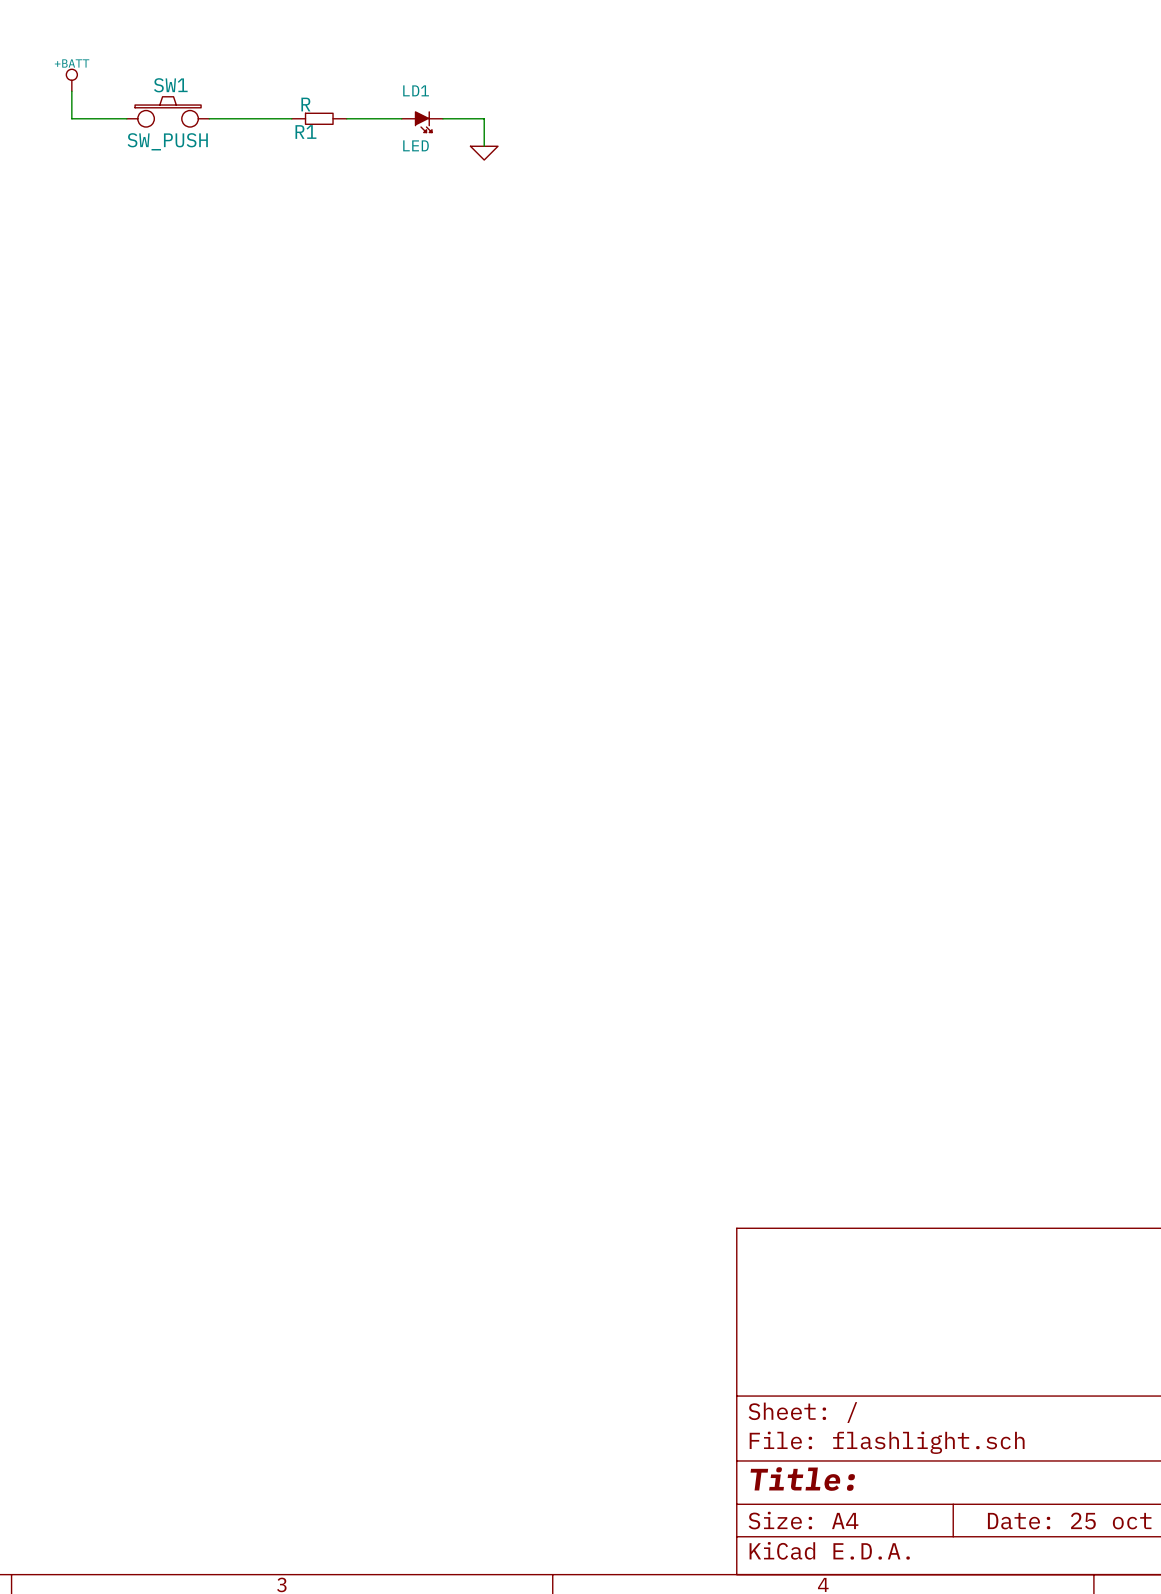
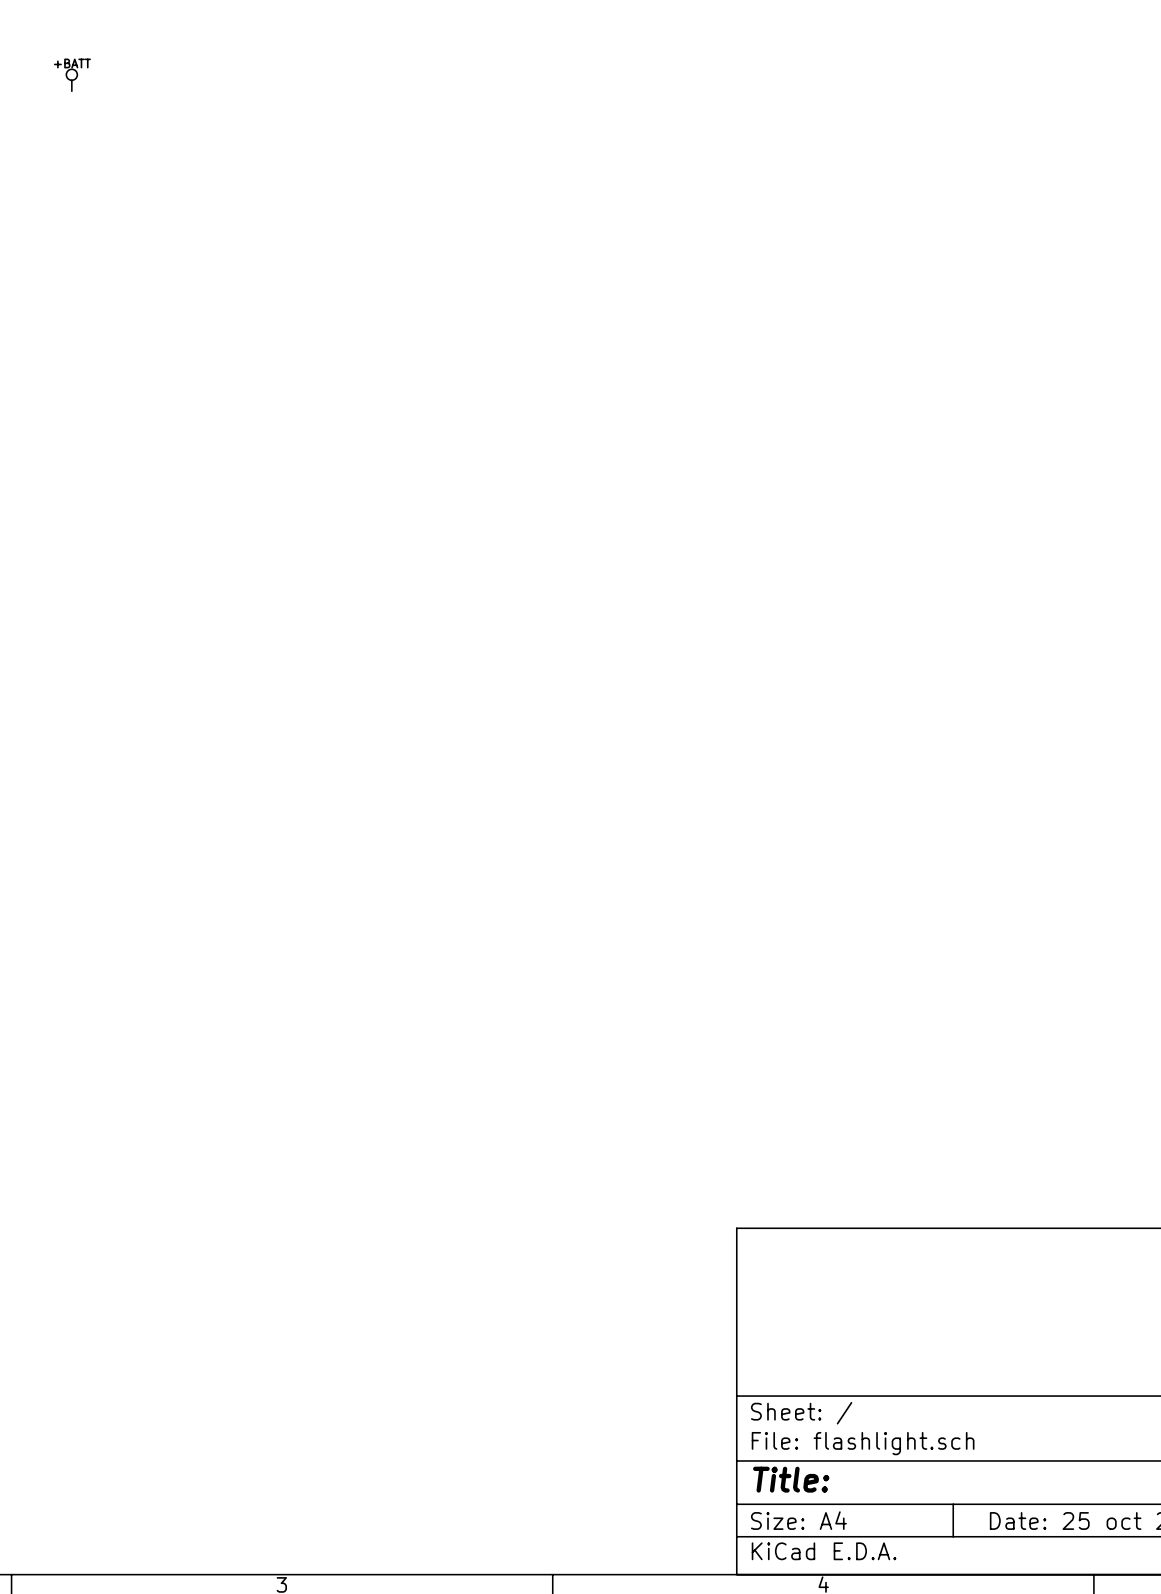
wire: (71, 91) (71, 118) (126, 118) -> none
SW1: SW_PUSH (168, 111) -> none
wire: (209, 118) (291, 118) -> none
R1: R (319, 118) -> none
wire: (346, 118) (401, 118) -> none
wire: (442, 118) (484, 118) (484, 146) -> none
LD1: LED (422, 122) -> none
power symbol: (484, 153) -> none

